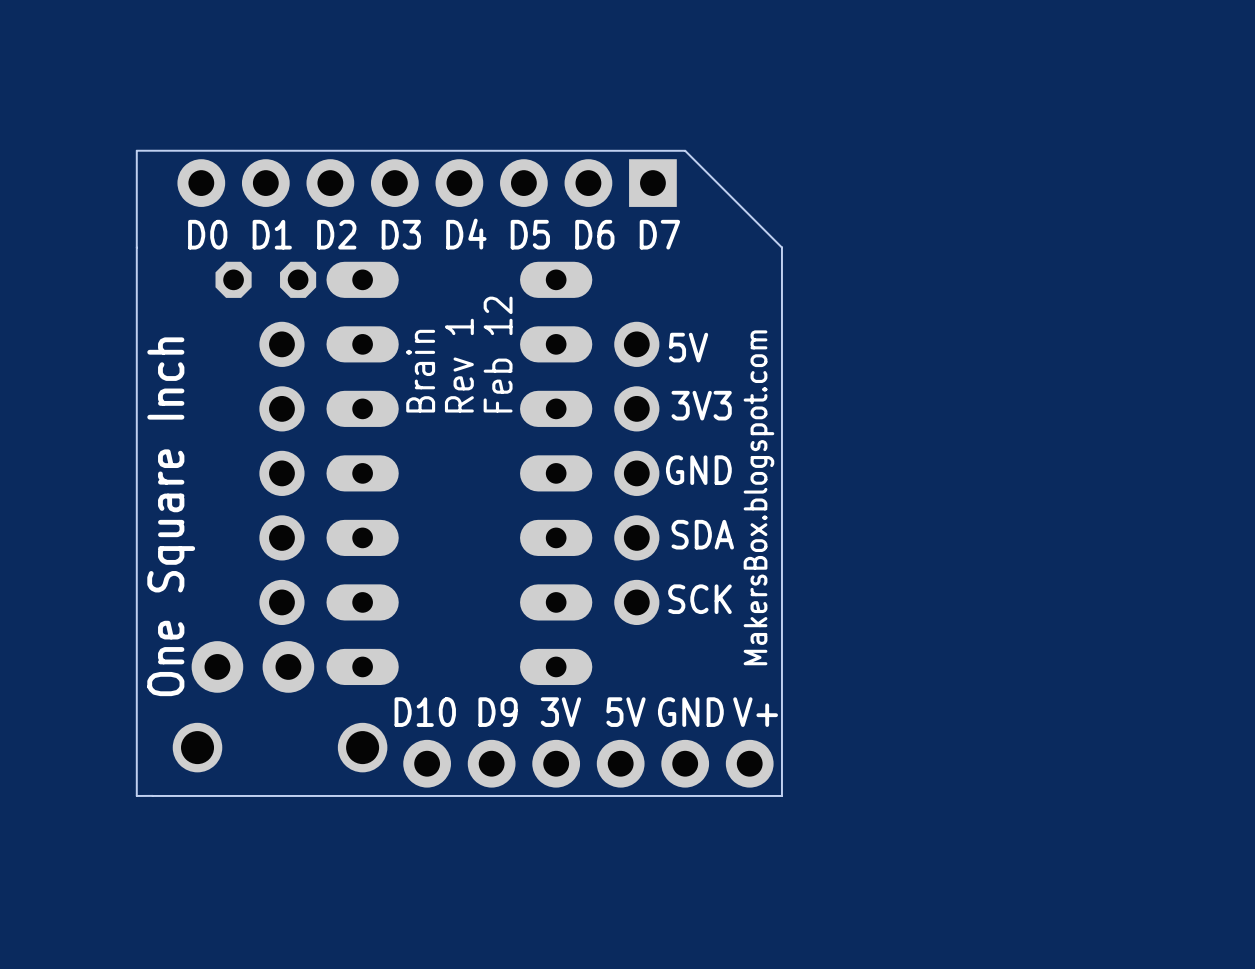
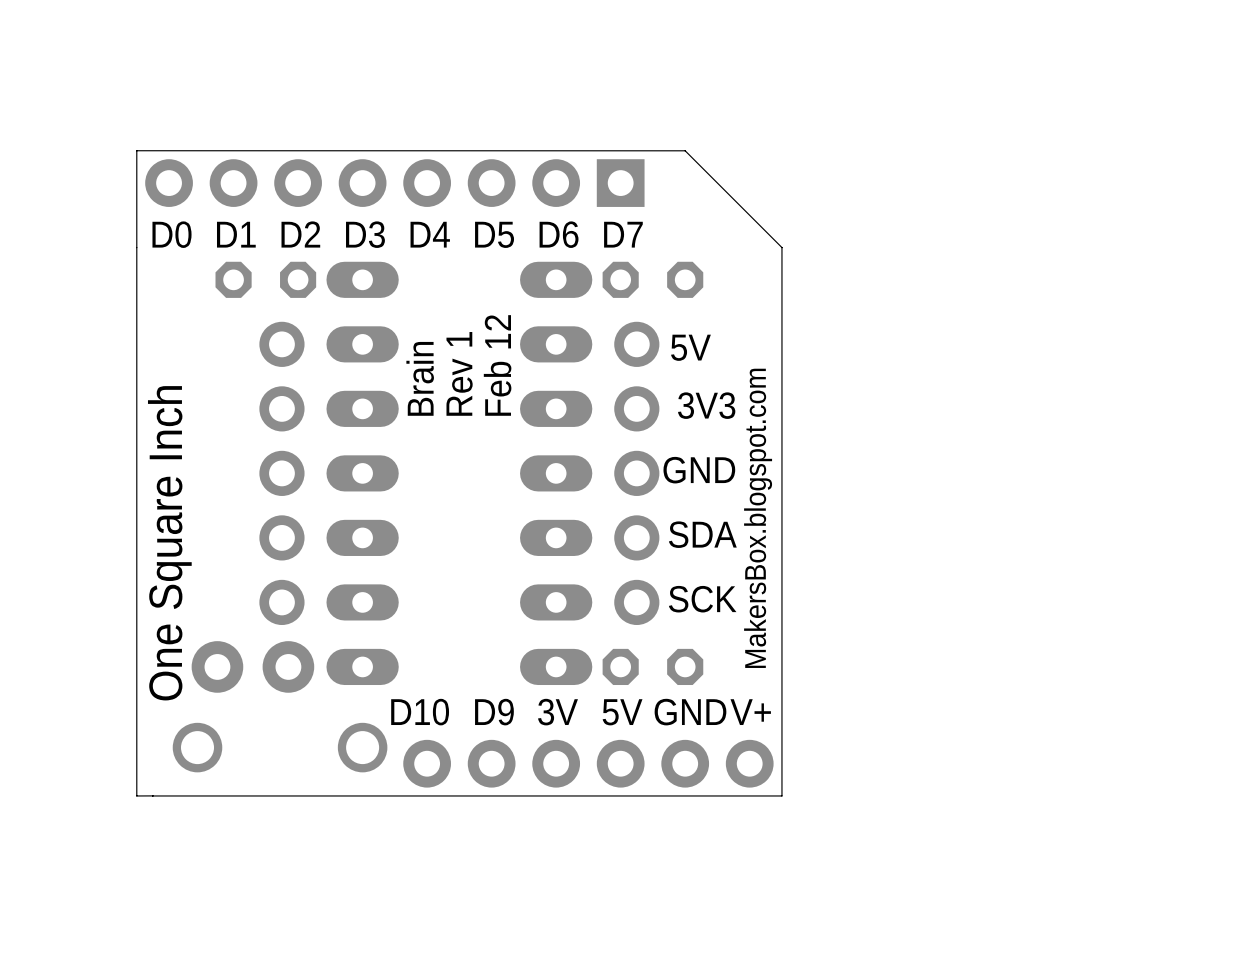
part position: (427, 183) -> (394, 183)
text position: D0 (207, 234) -> D0 (172, 234)
text position: D1 (272, 234) -> D1 (236, 234)
text position: D2 (336, 234) -> D2 (300, 234)
text position: D3 (401, 234) -> D3 (365, 234)
text position: D4 (466, 234) -> D4 (430, 234)
text position: D5 (530, 234) -> D5 (494, 234)
text position: D6 (594, 234) -> D6 (559, 234)
text position: D7 (659, 234) -> D7 (623, 234)
part: none -> (652, 279)
part: none -> (652, 666)

